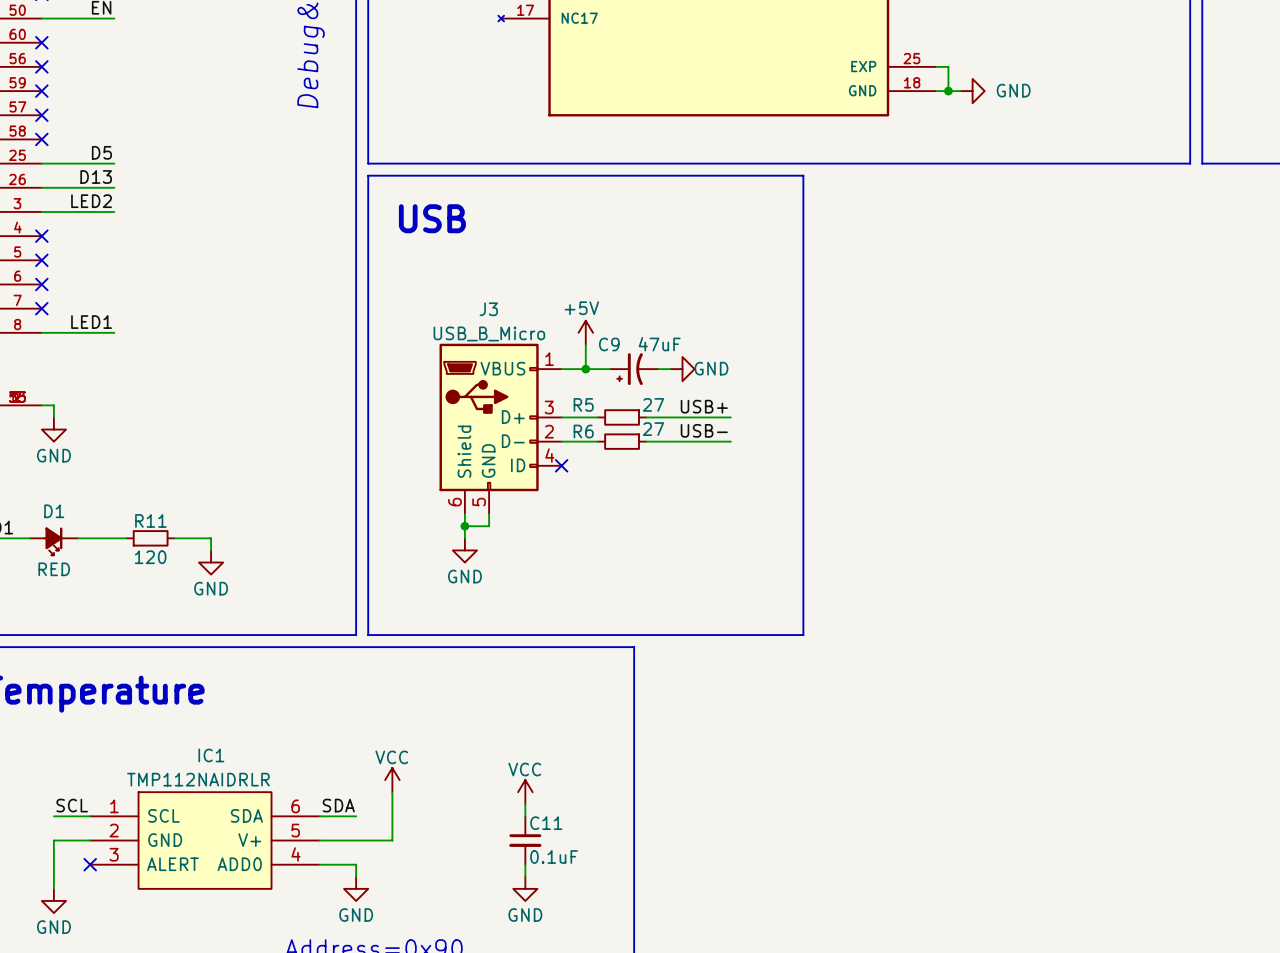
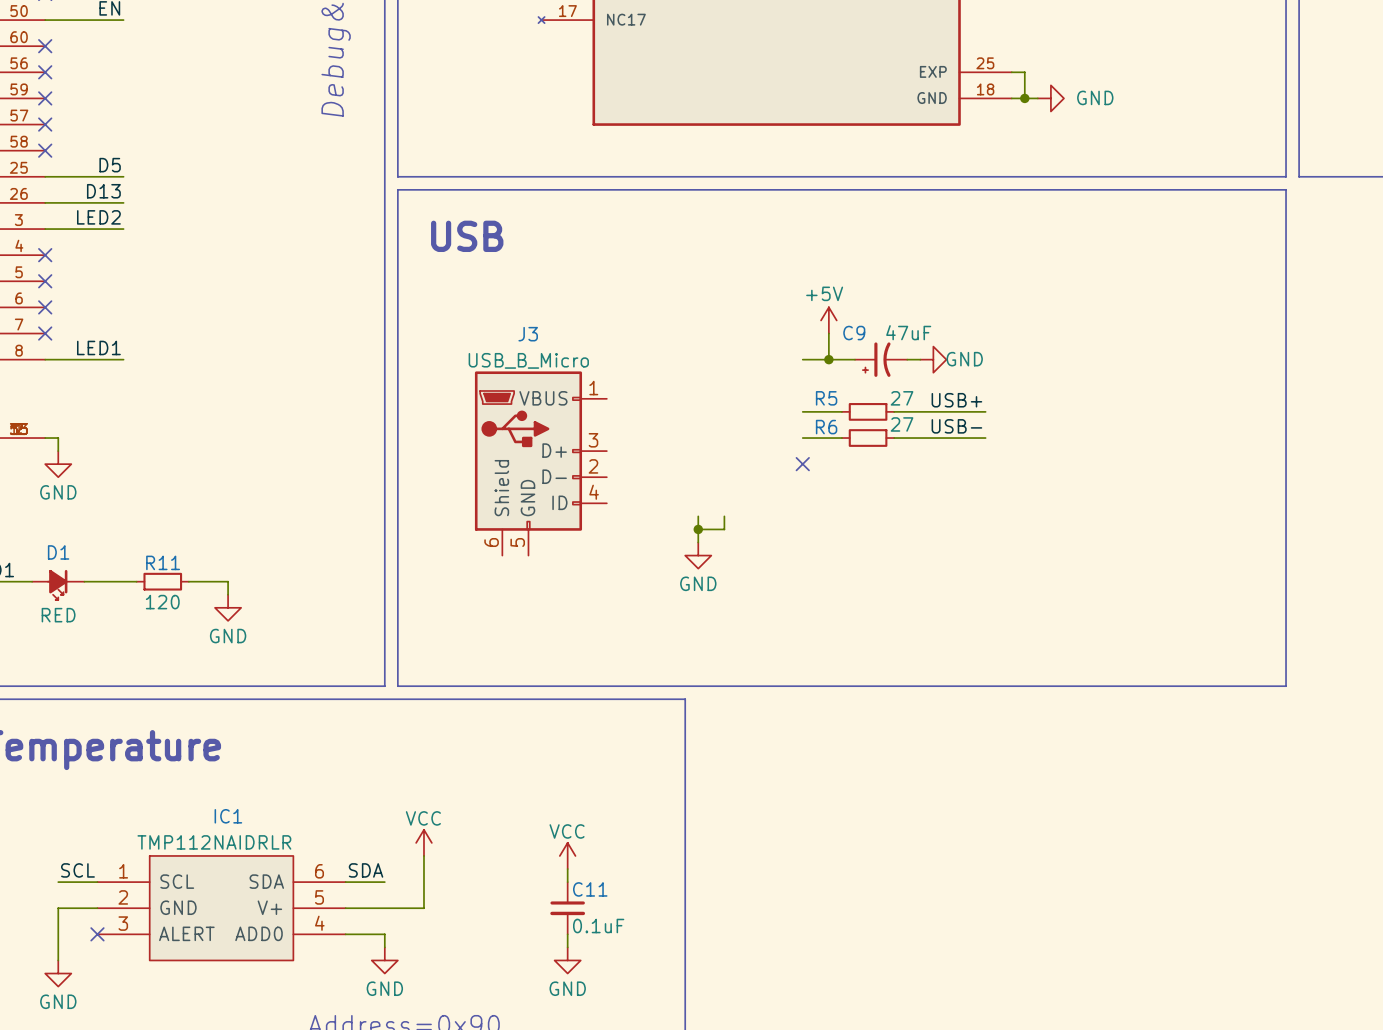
line: (803, 175) (803, 635) -> (868, 189) (1286, 189) (1286, 686) (868, 686)
power symbol position: +5V (585, 332) -> +5V (828, 320)
junction: none -> (828, 359)
power symbol: none -> GND (933, 359)
wire: (585, 344) (585, 369) -> (828, 333) (828, 359)
wire: (561, 369) (609, 369) -> (802, 359) (855, 359)
junction: (585, 369) -> none
C9 position: (634, 369) -> (881, 359)
wire: (658, 369) (670, 369) -> (907, 359) (920, 359)
power symbol: GND (682, 369) -> none
label position: USB+ (704, 406) -> USB+ (956, 400)
wire: (561, 417) (597, 417) -> (802, 411) (841, 411)
R5 position: (622, 417) -> (868, 411)
wire: (646, 417) (730, 417) -> (894, 411) (985, 411)
no-connect mark: none -> (802, 464)
label position: USB- (704, 430) -> USB- (956, 426)
wire: (561, 441) (597, 441) -> (802, 438) (841, 438)
R6 position: (622, 441) -> (868, 438)
wire: (646, 441) (730, 441) -> (894, 438) (985, 438)
no-connect mark: (561, 465) -> none
junction: none -> (698, 529)
wire: (464, 514) (464, 538) -> (698, 516) (698, 542)
wire: (489, 514) (489, 526) (464, 526) -> (724, 516) (724, 529) (698, 529)
power symbol: none -> GND (698, 555)
junction: (464, 526) -> none
power symbol: GND (464, 550) -> none

